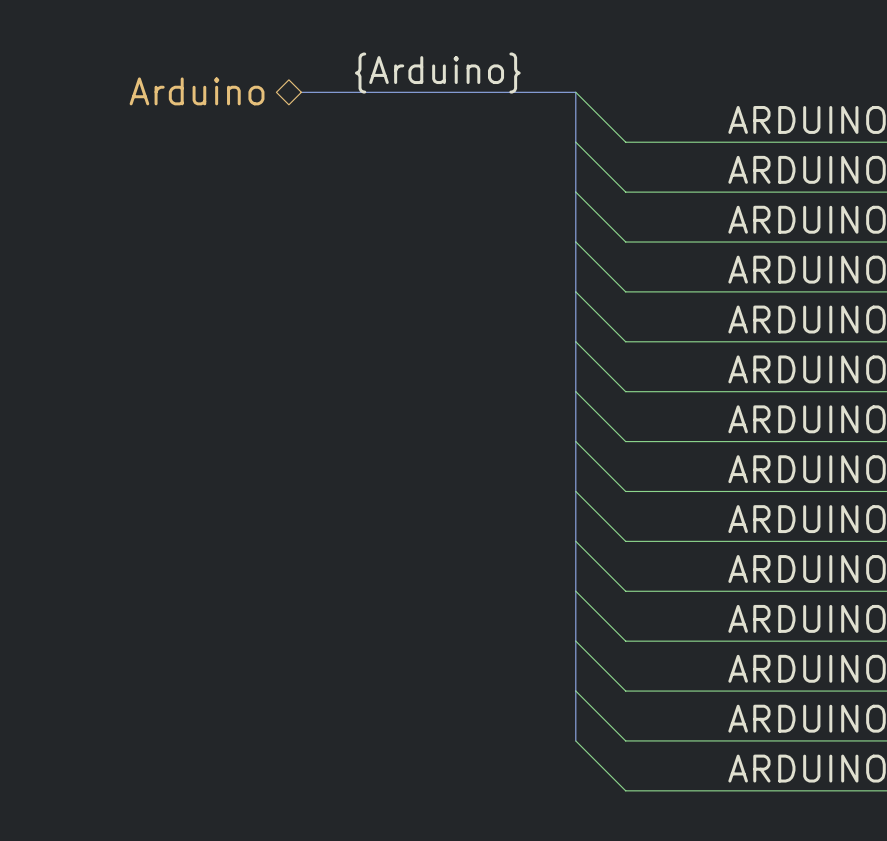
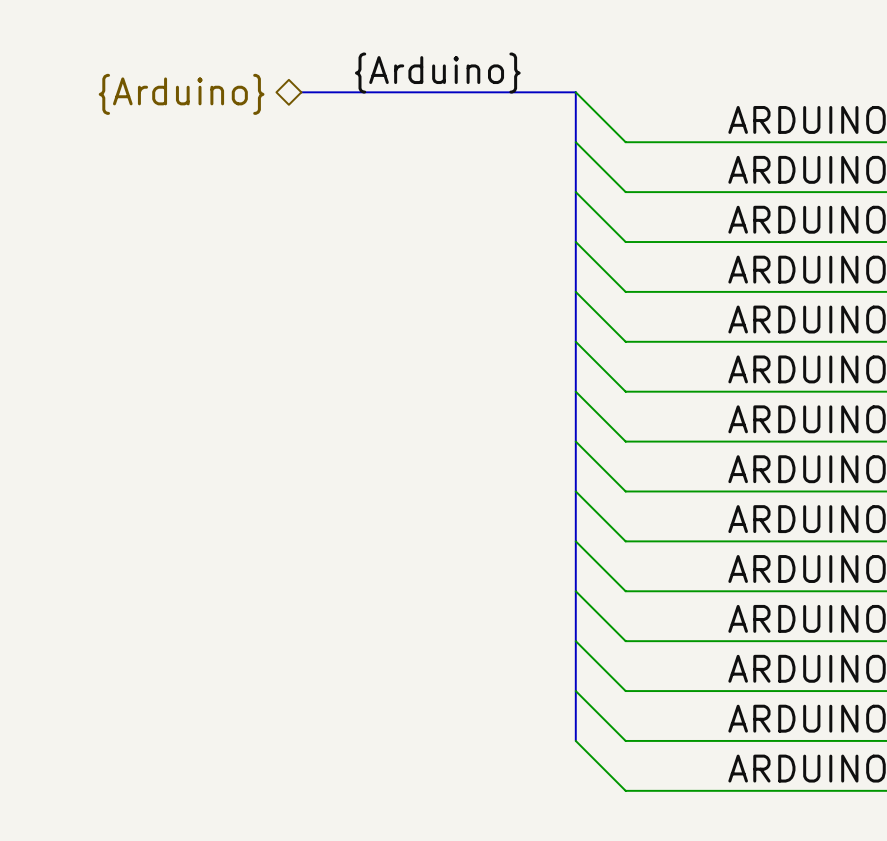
hierarchical label: Arduino (197, 91) -> {Arduino} (181, 94)

